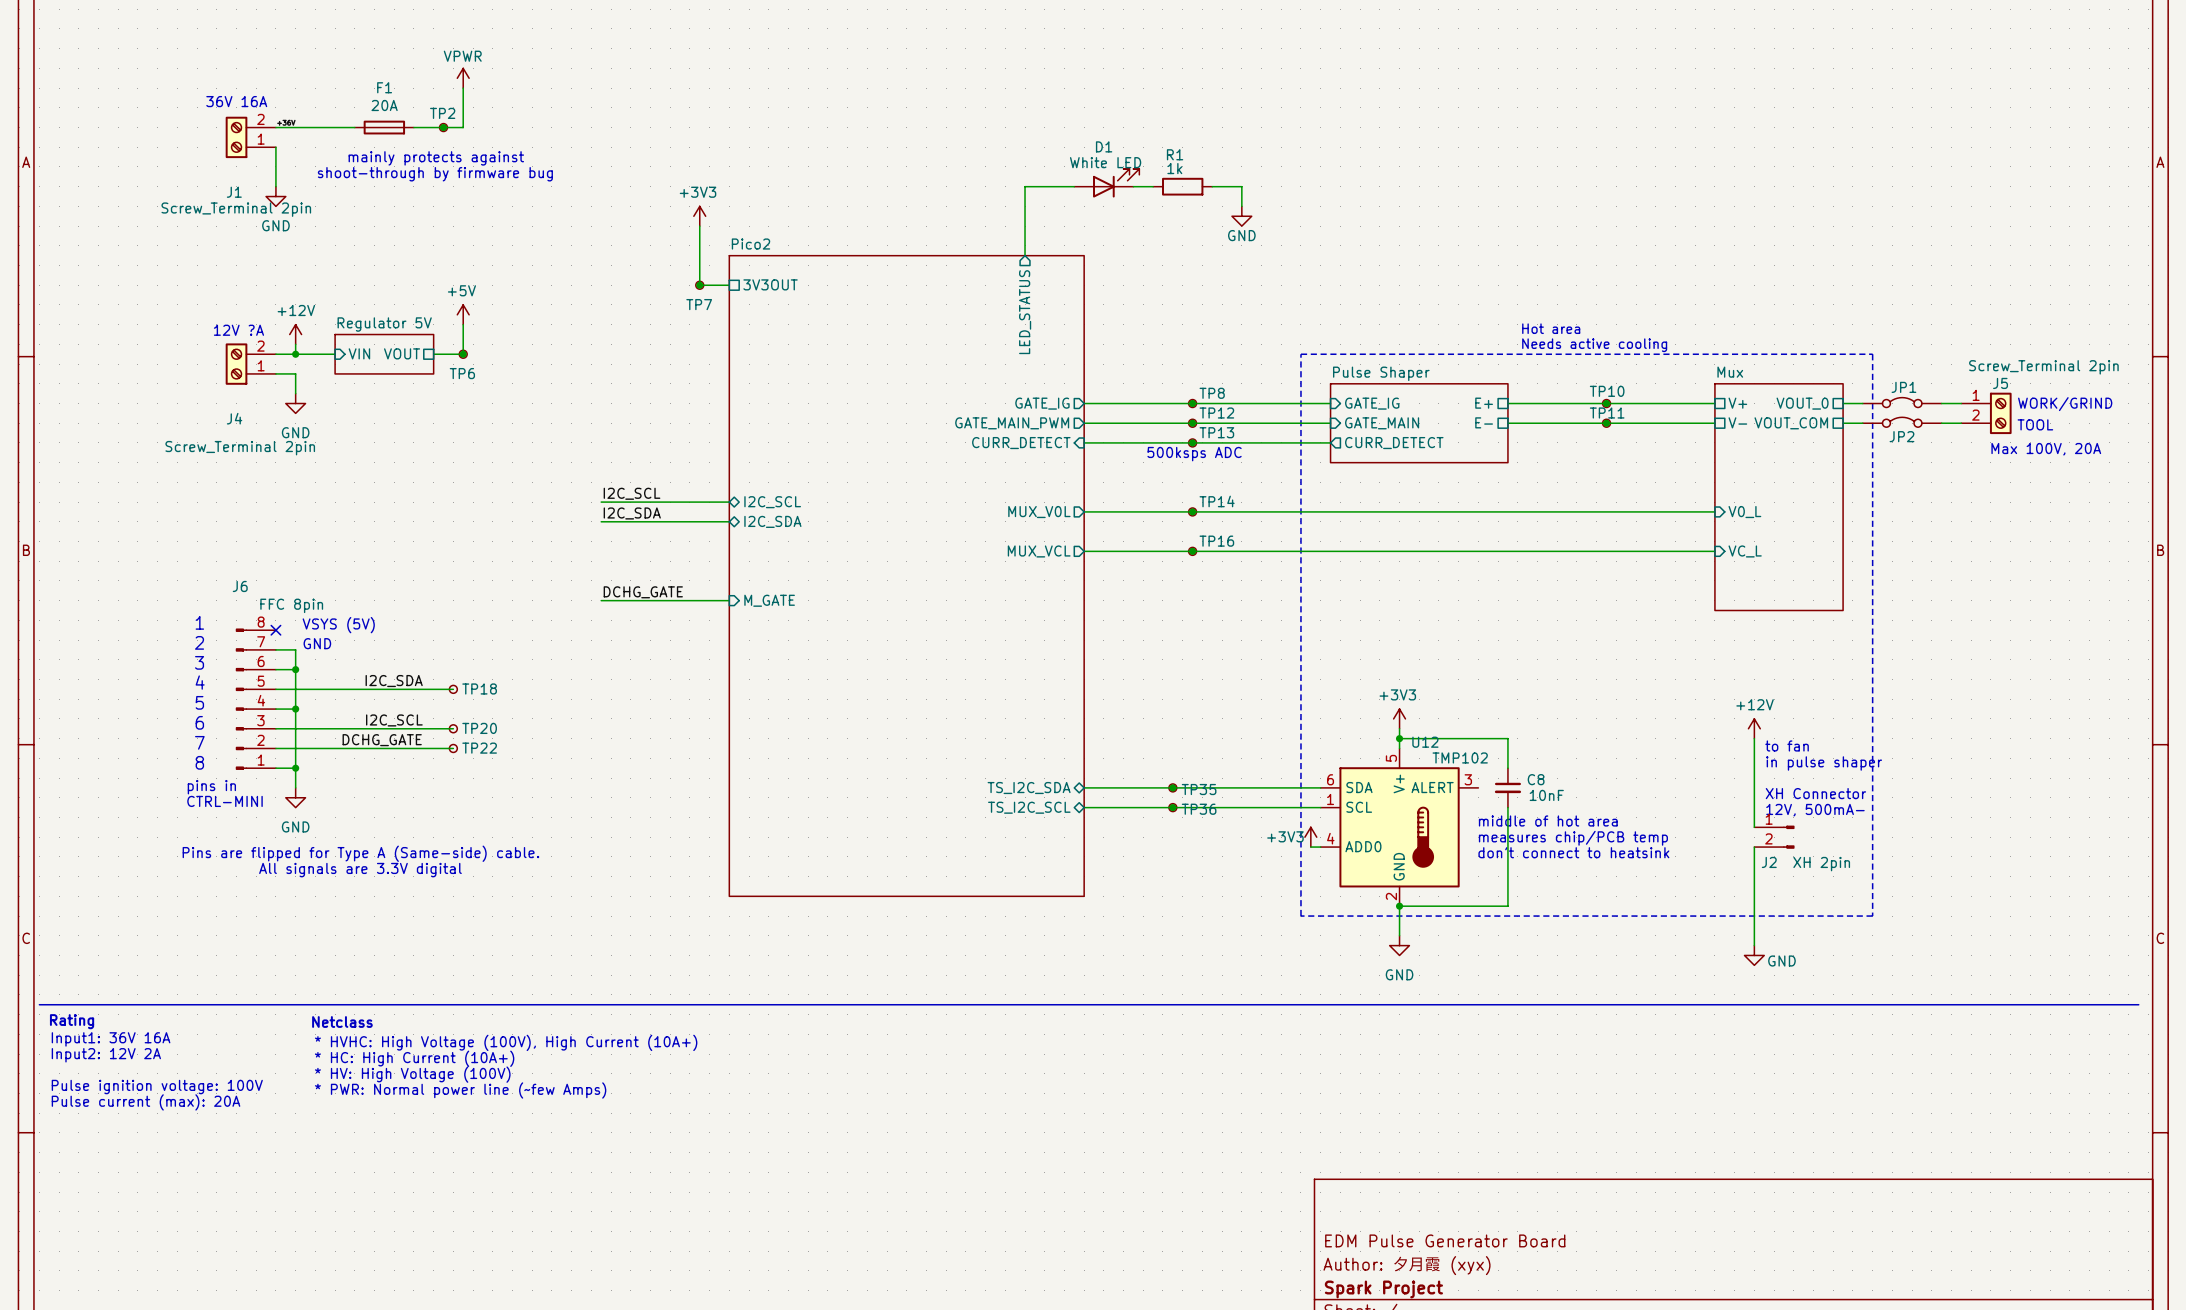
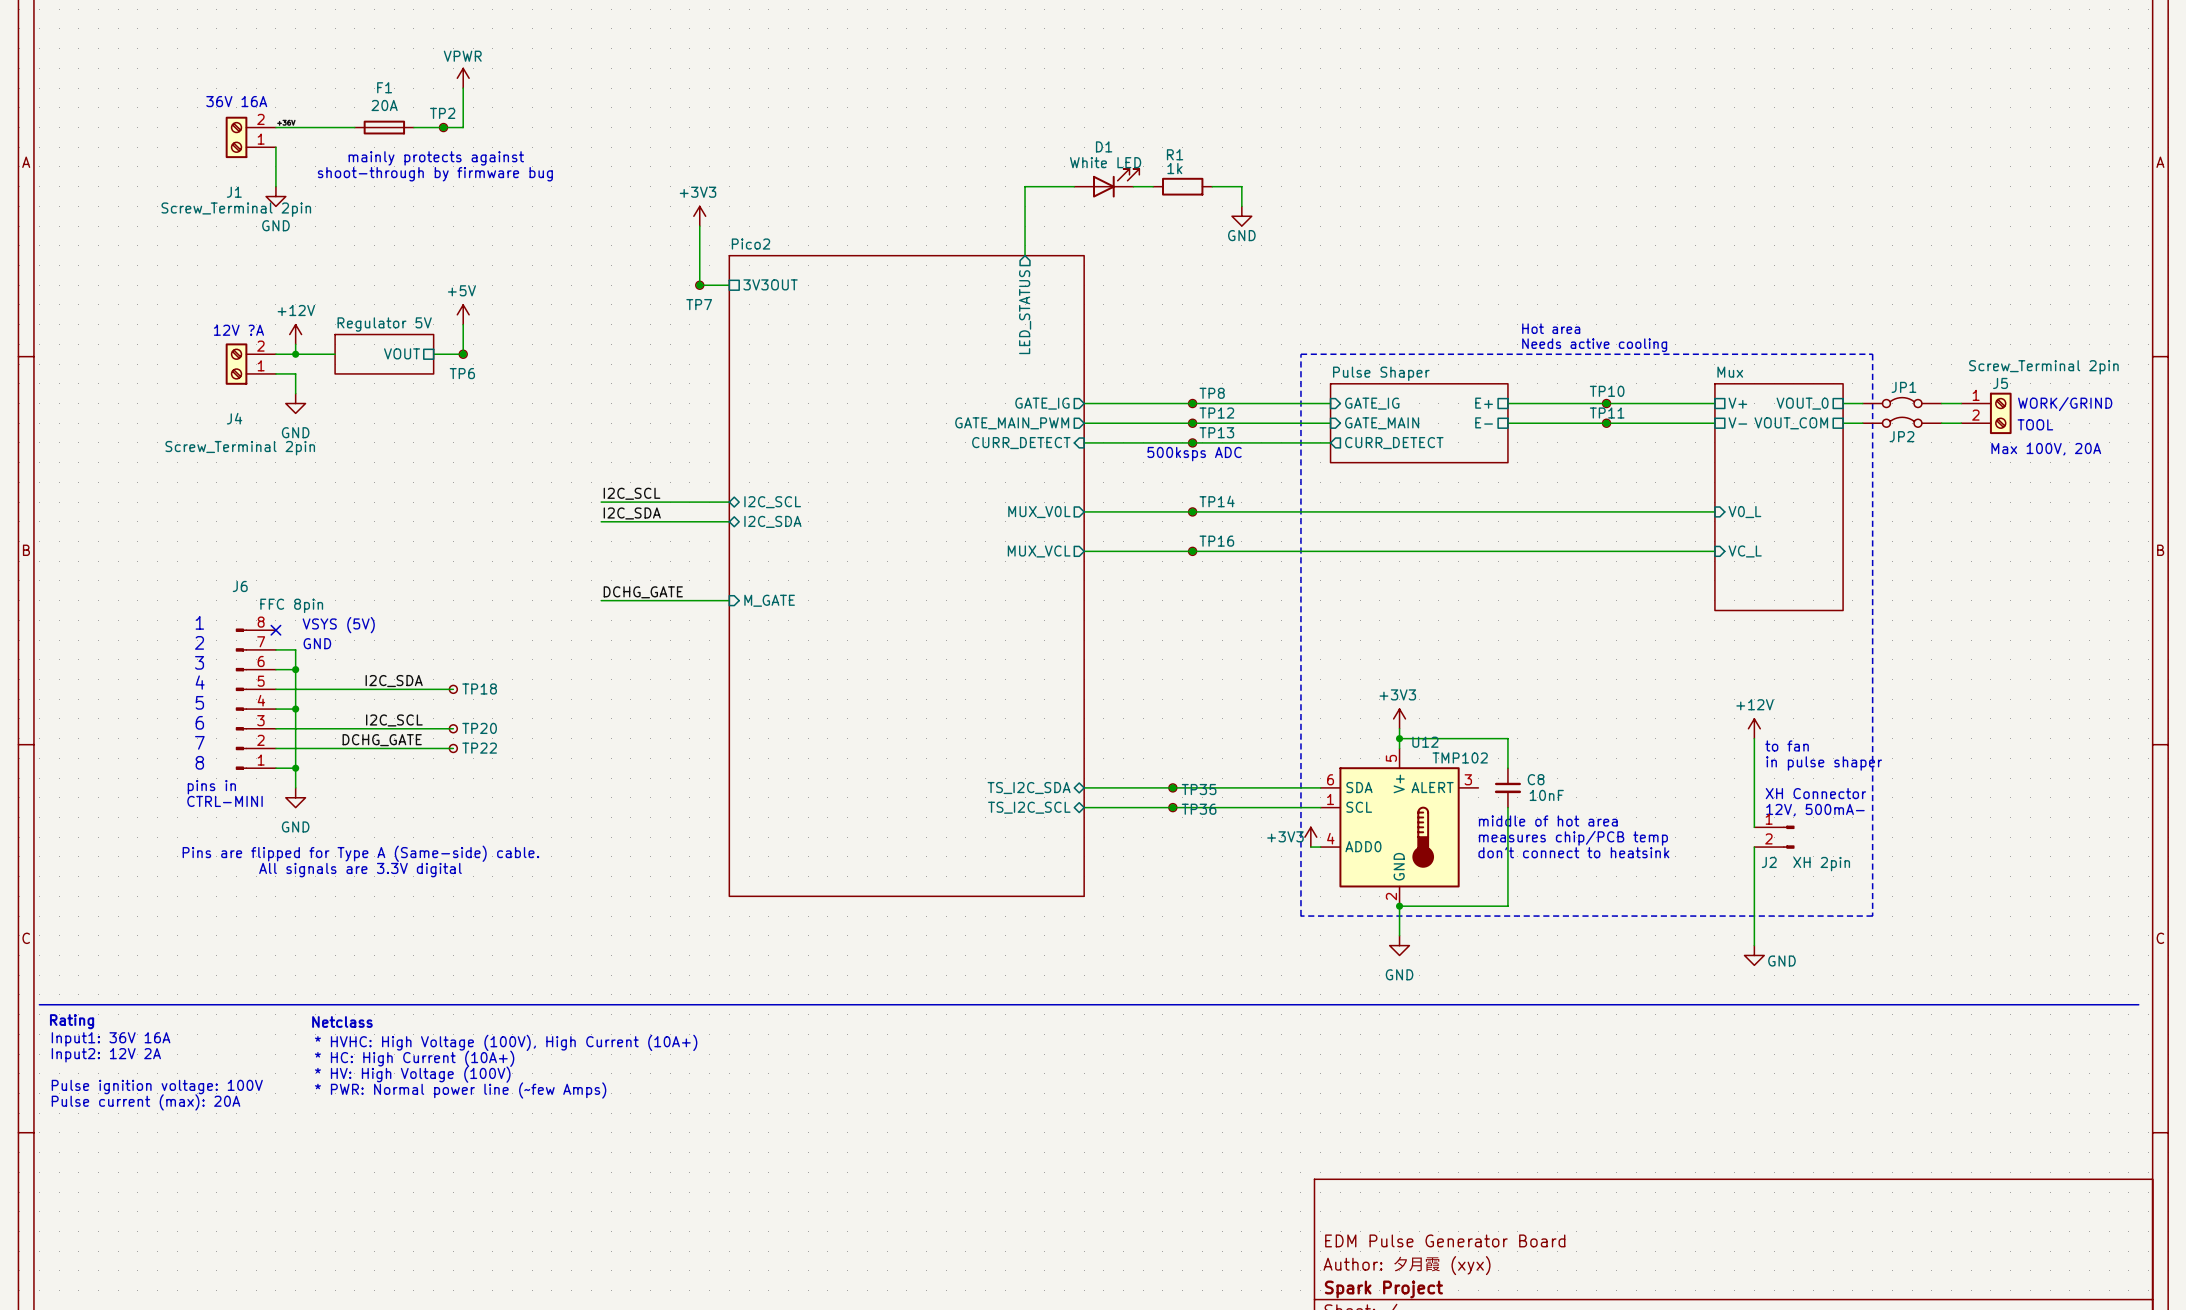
sheet pin: VIN (359, 353) -> none

